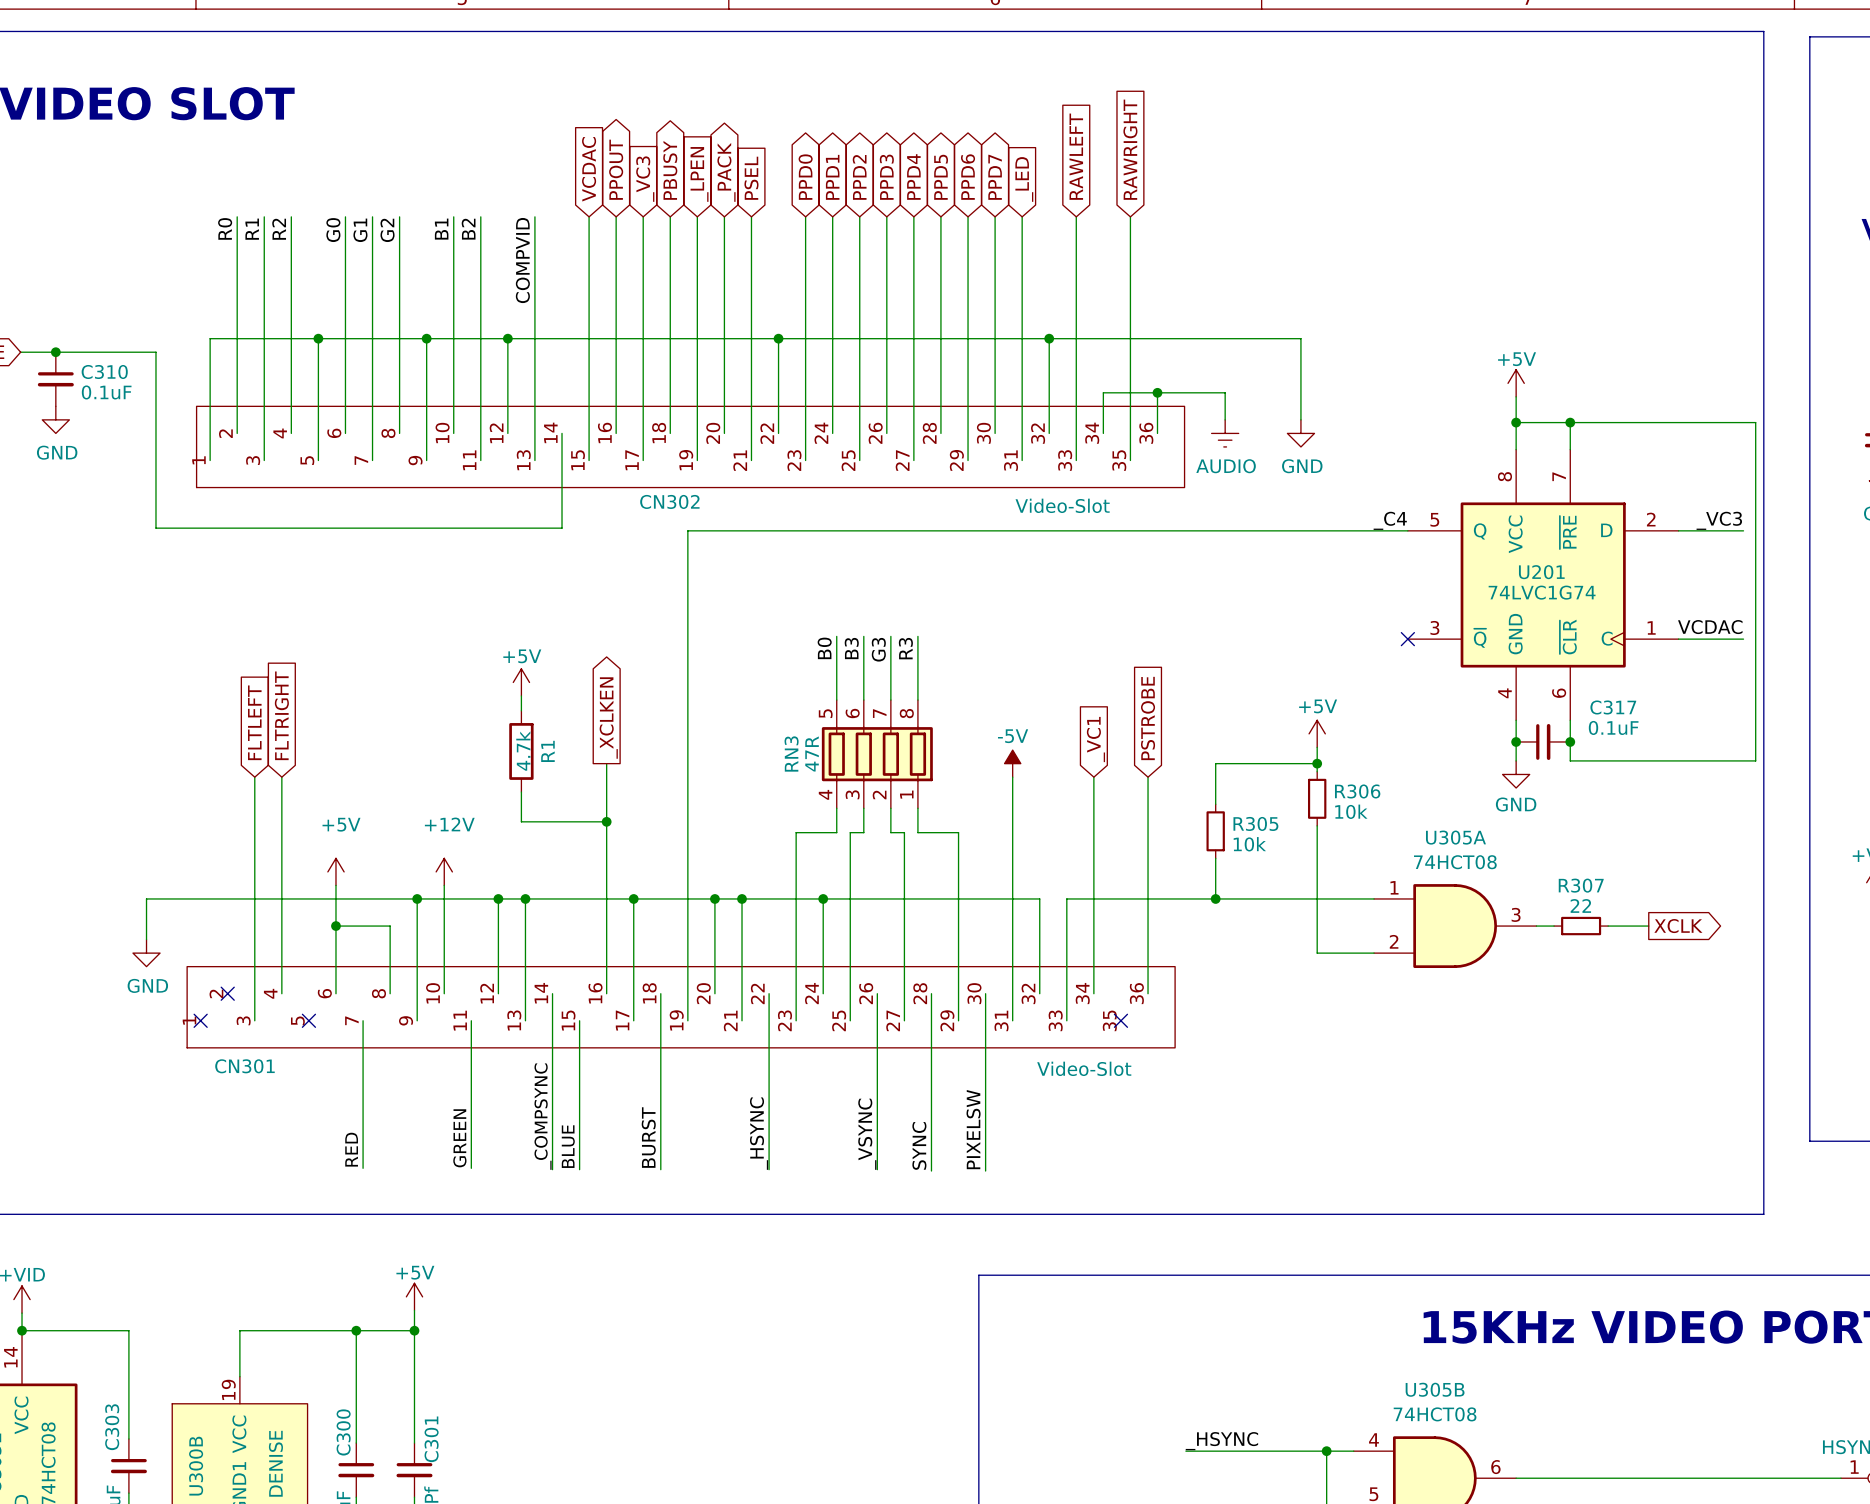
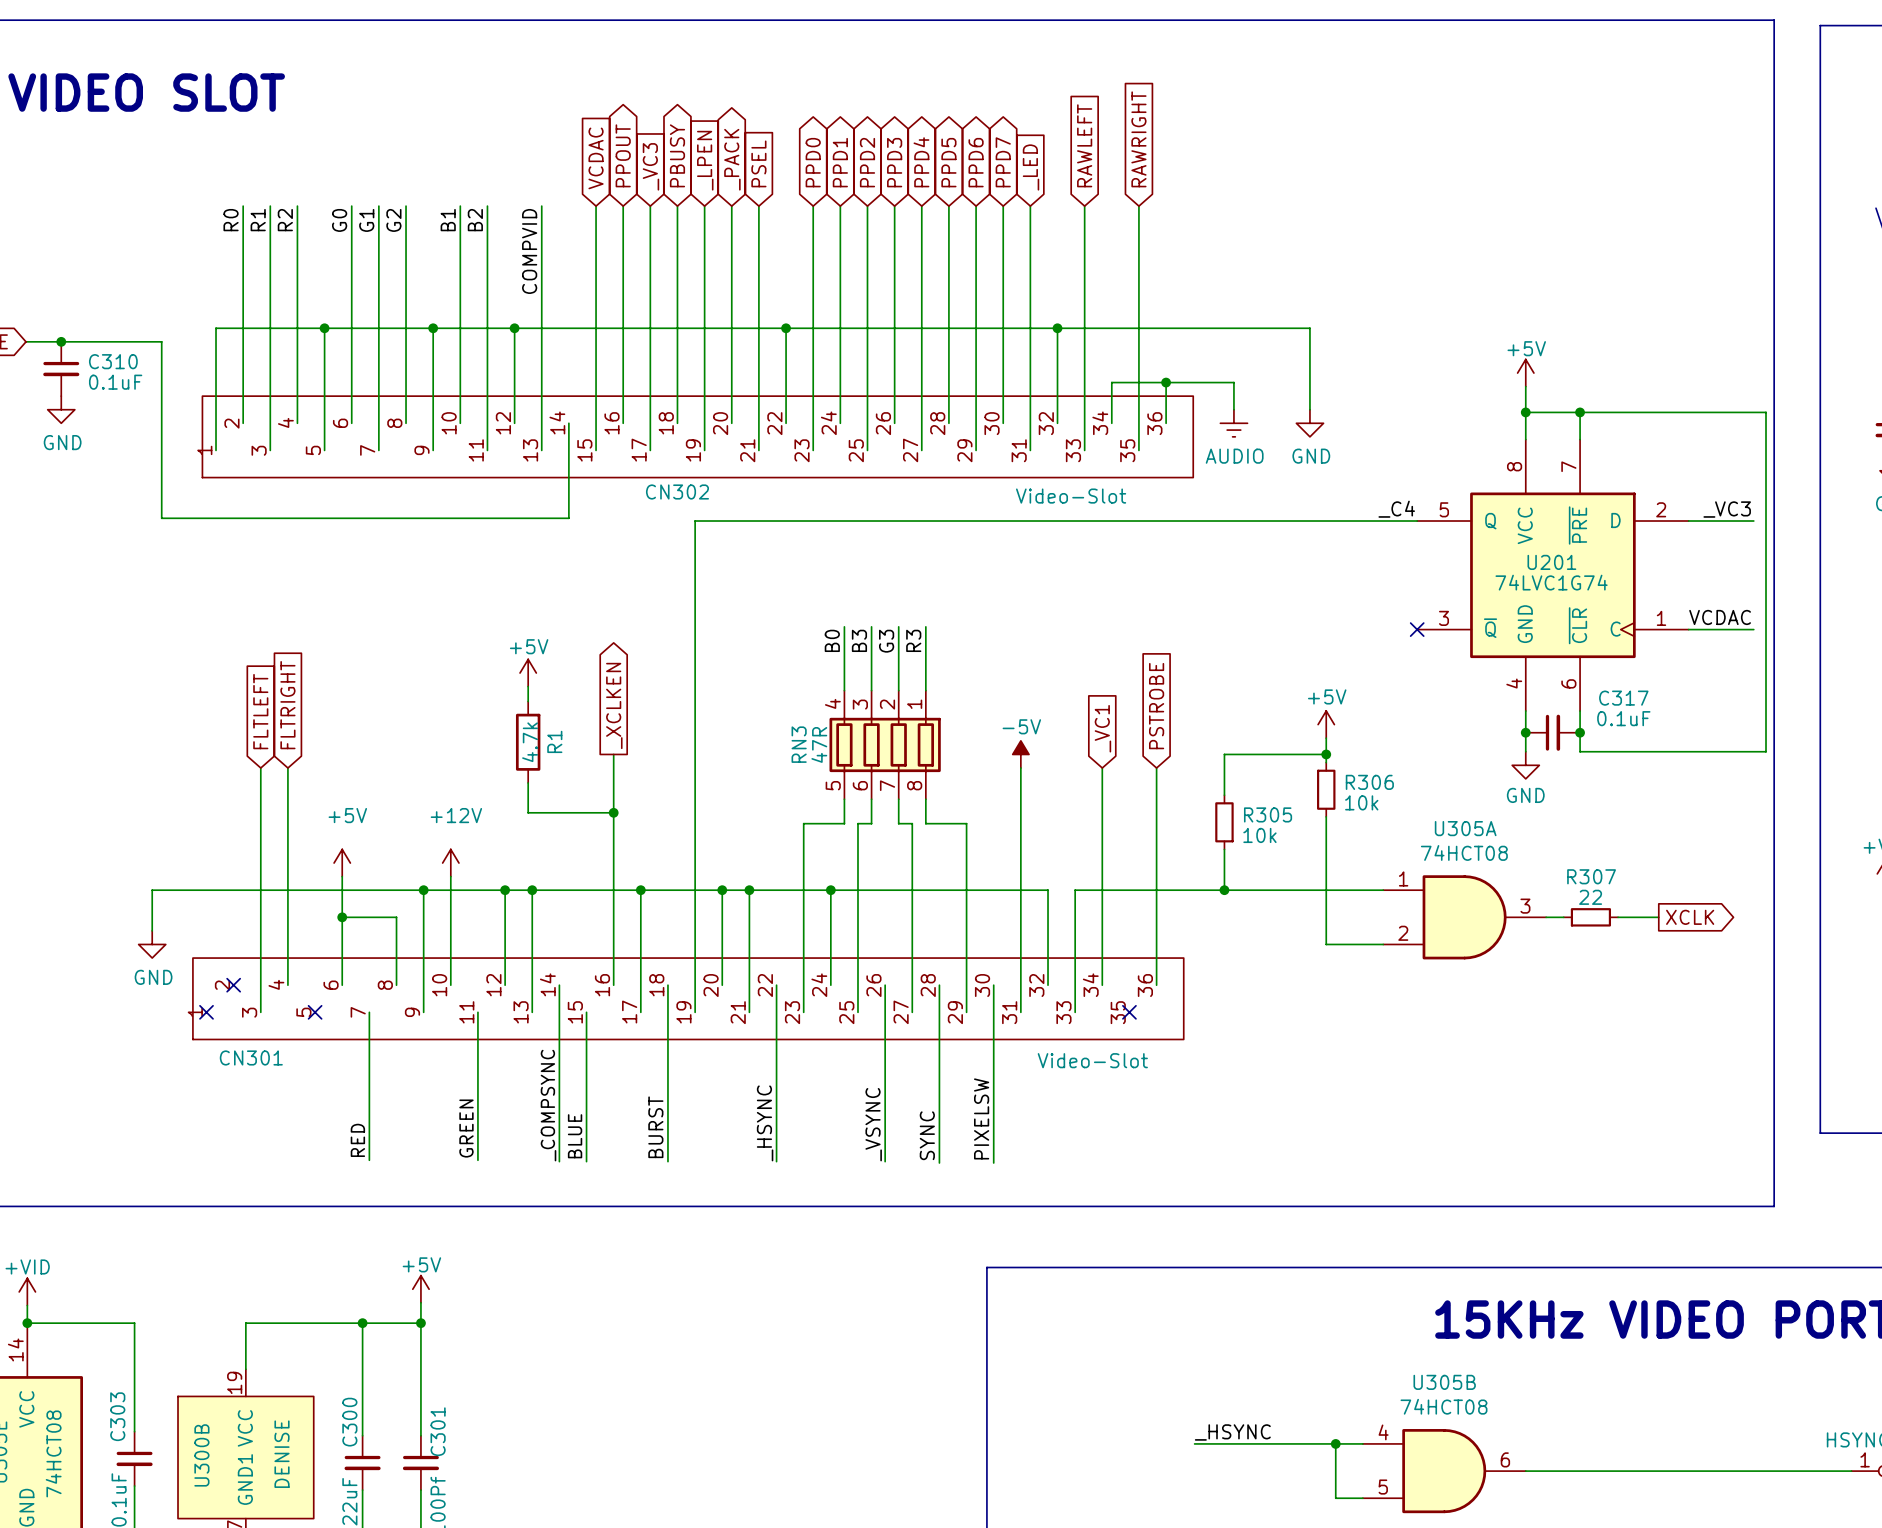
RN3 flip: as is (877, 754) -> up-down (885, 744)

